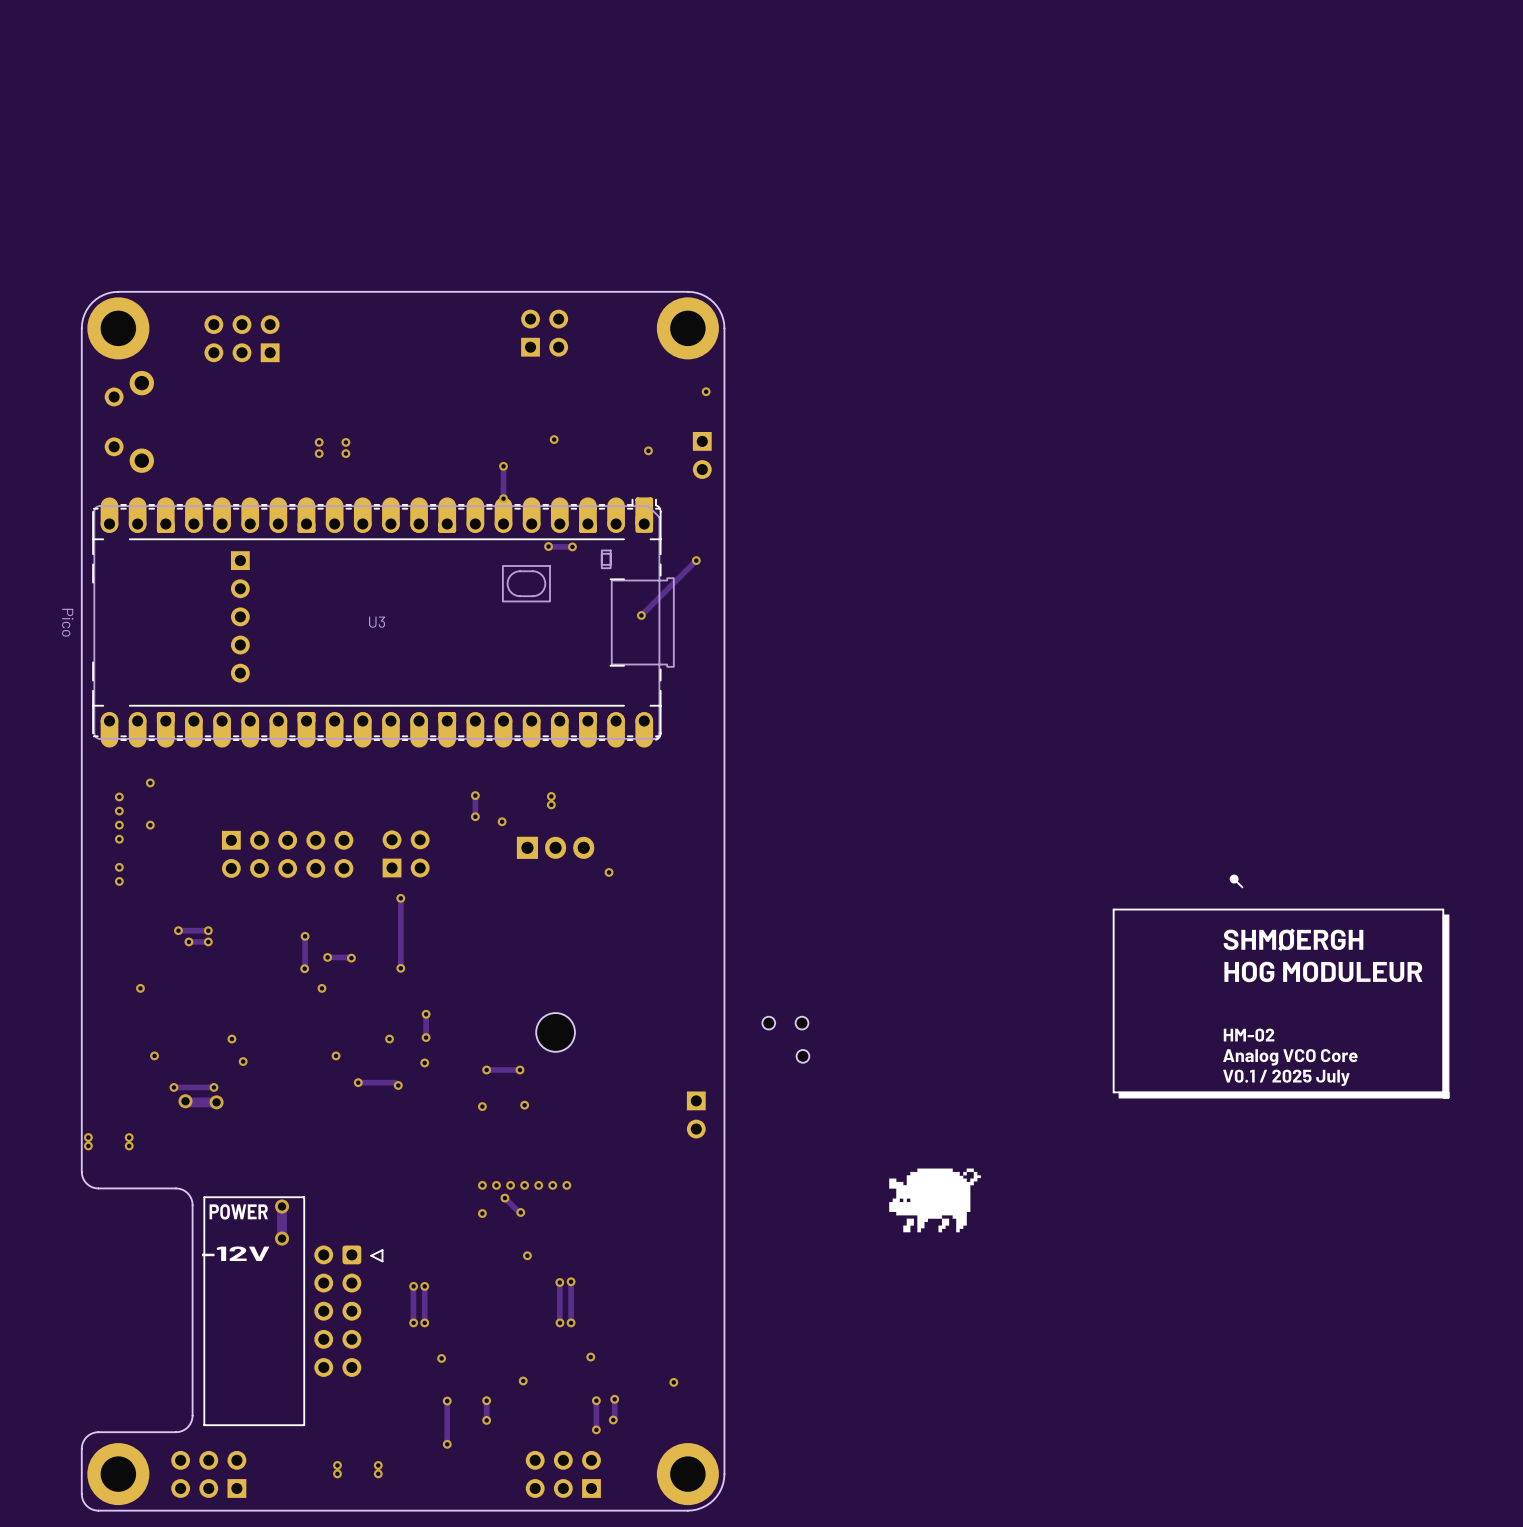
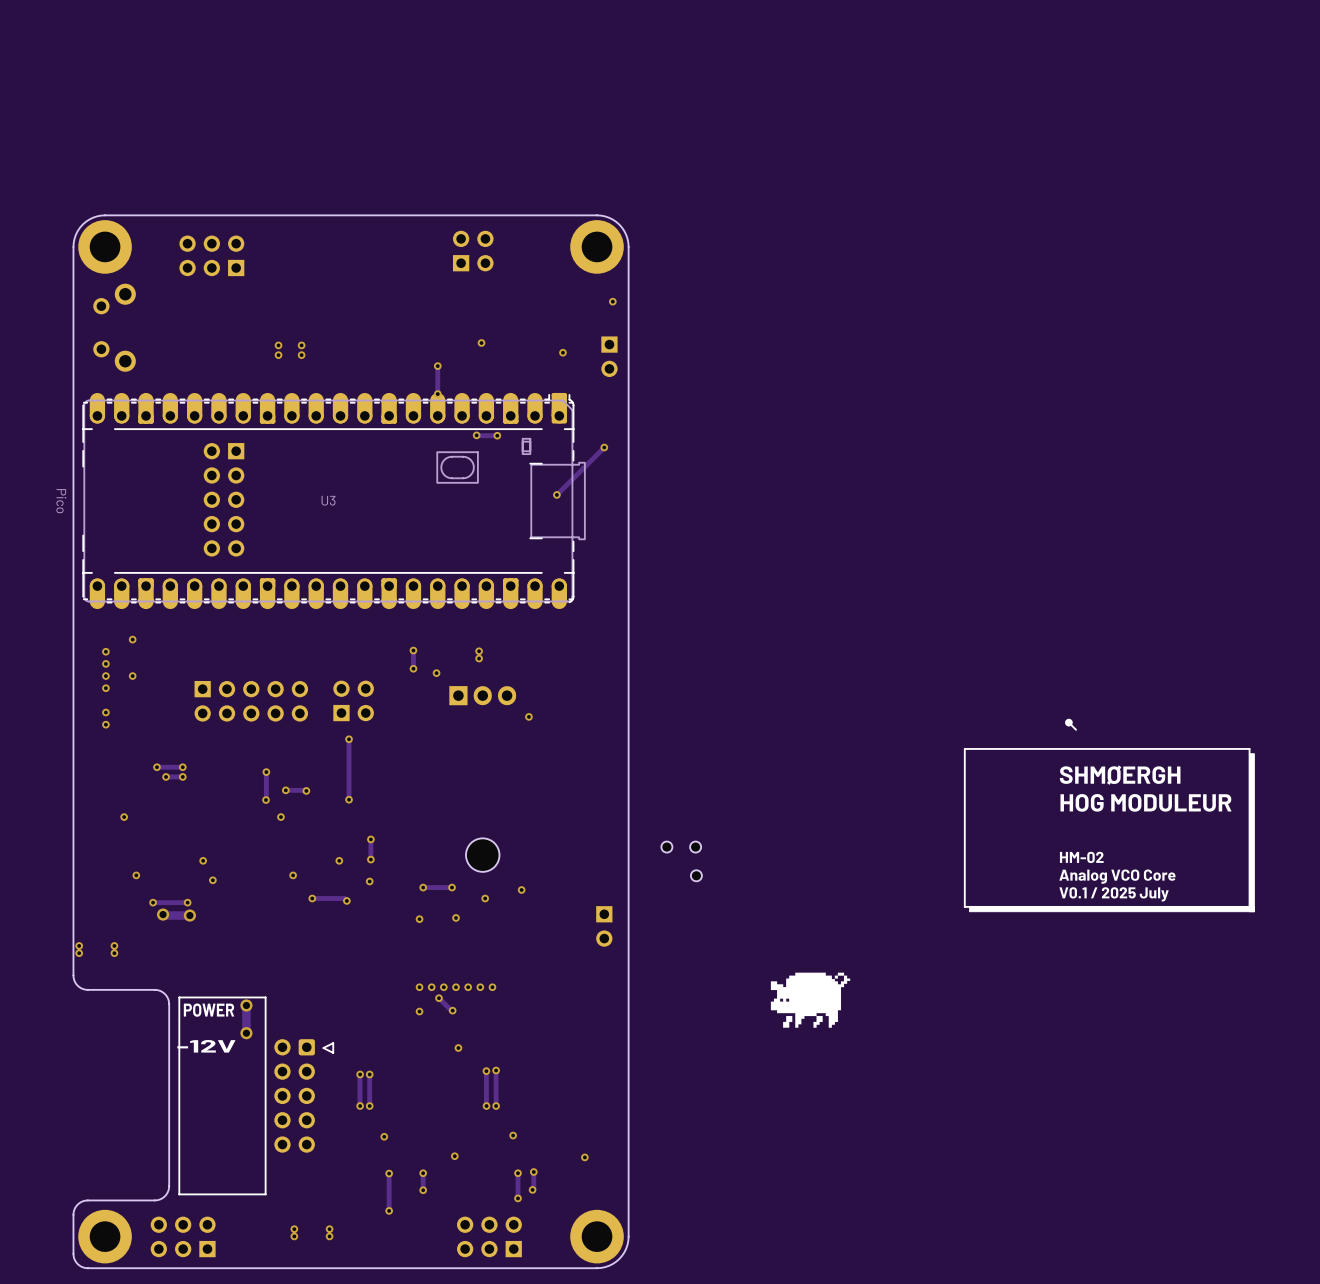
part: (240, 616) -> none
part: none -> (224, 499)
via: none -> (521, 890)
via: none -> (485, 898)

